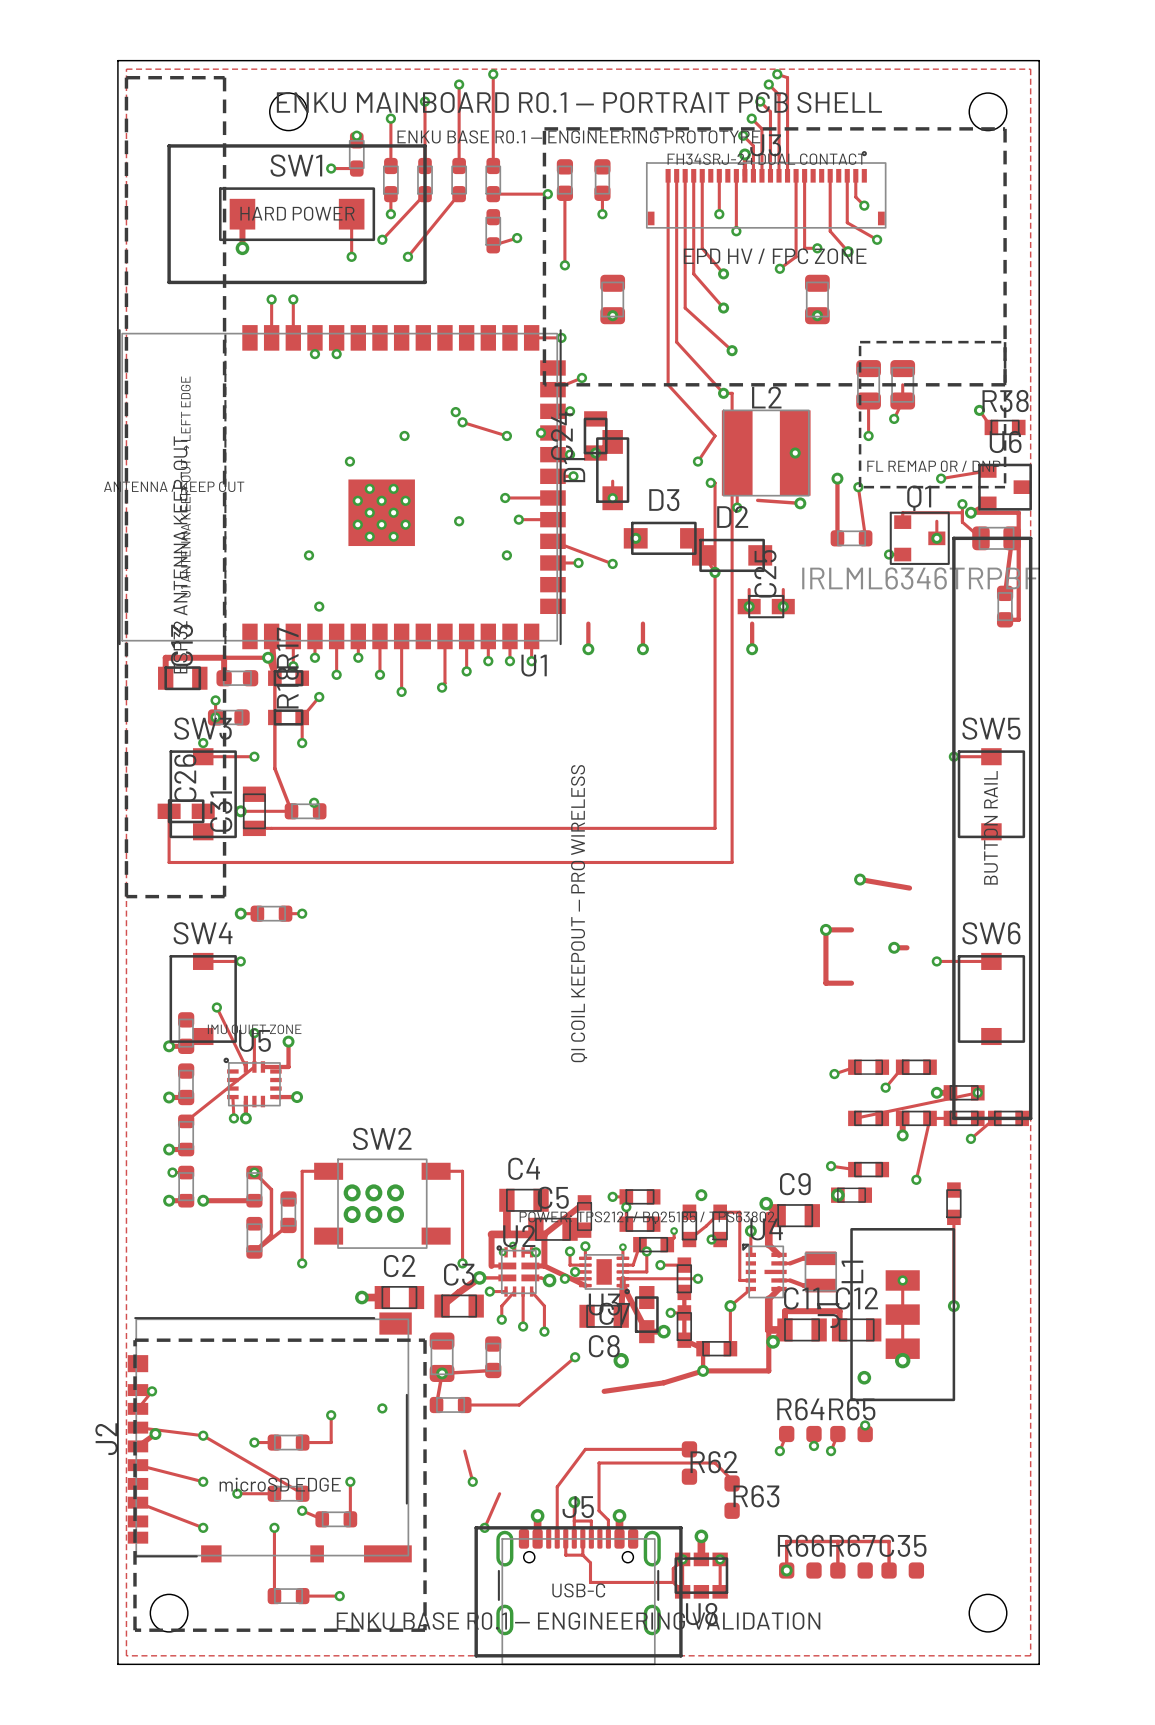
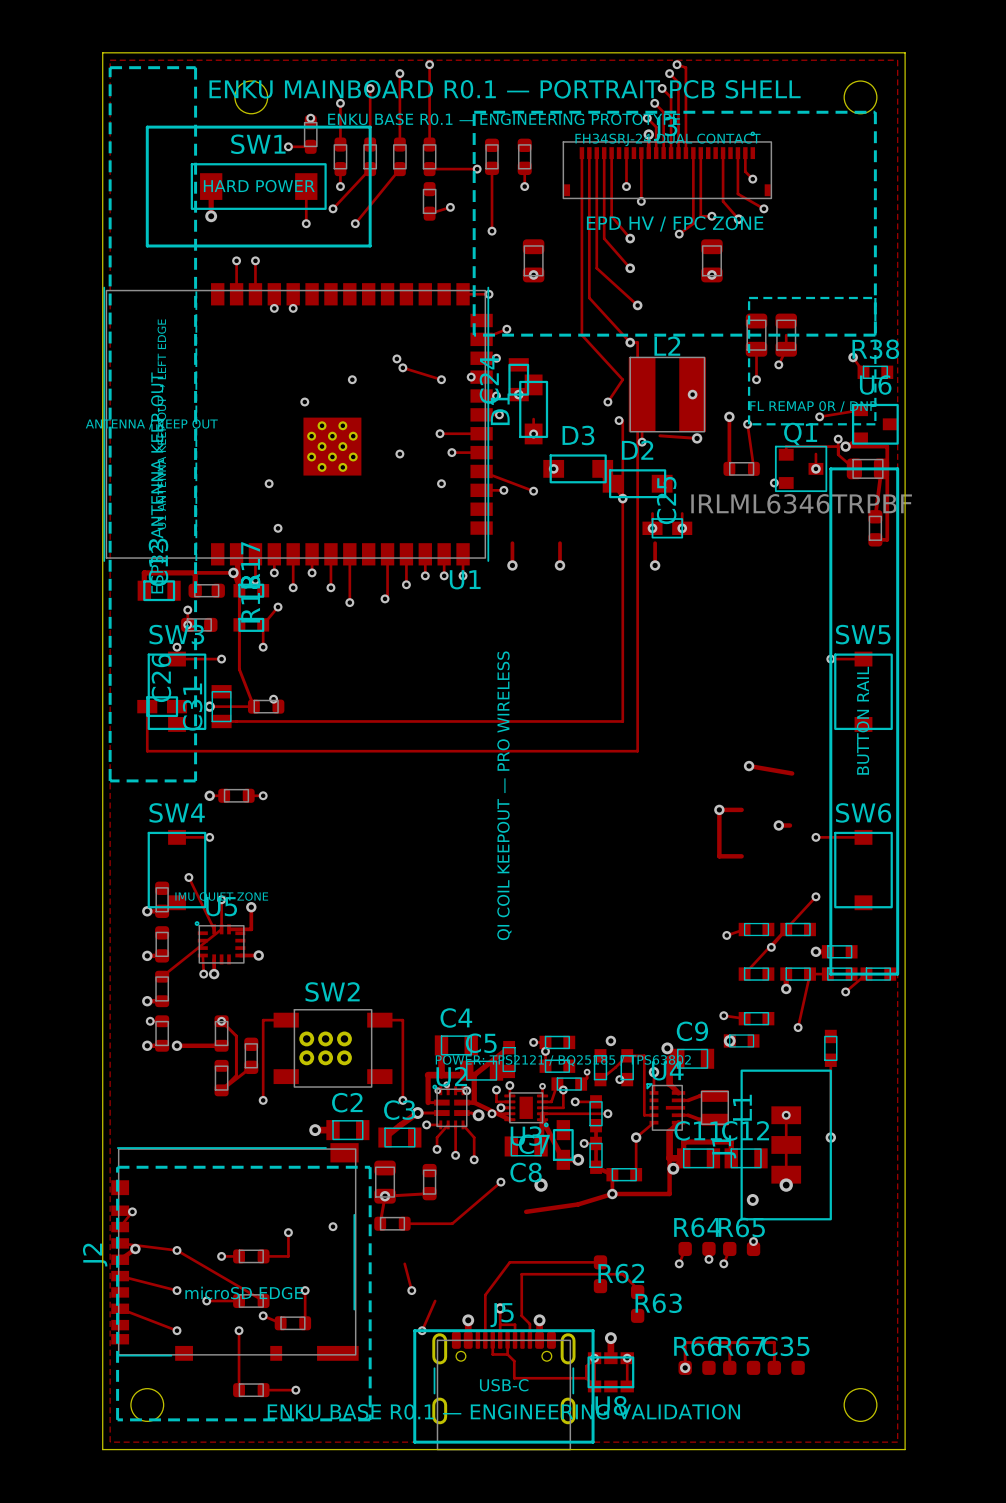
track: (977, 1092) (854, 1118) -> (815, 896) (744, 974)
via position: (977, 1092) -> (815, 896)

